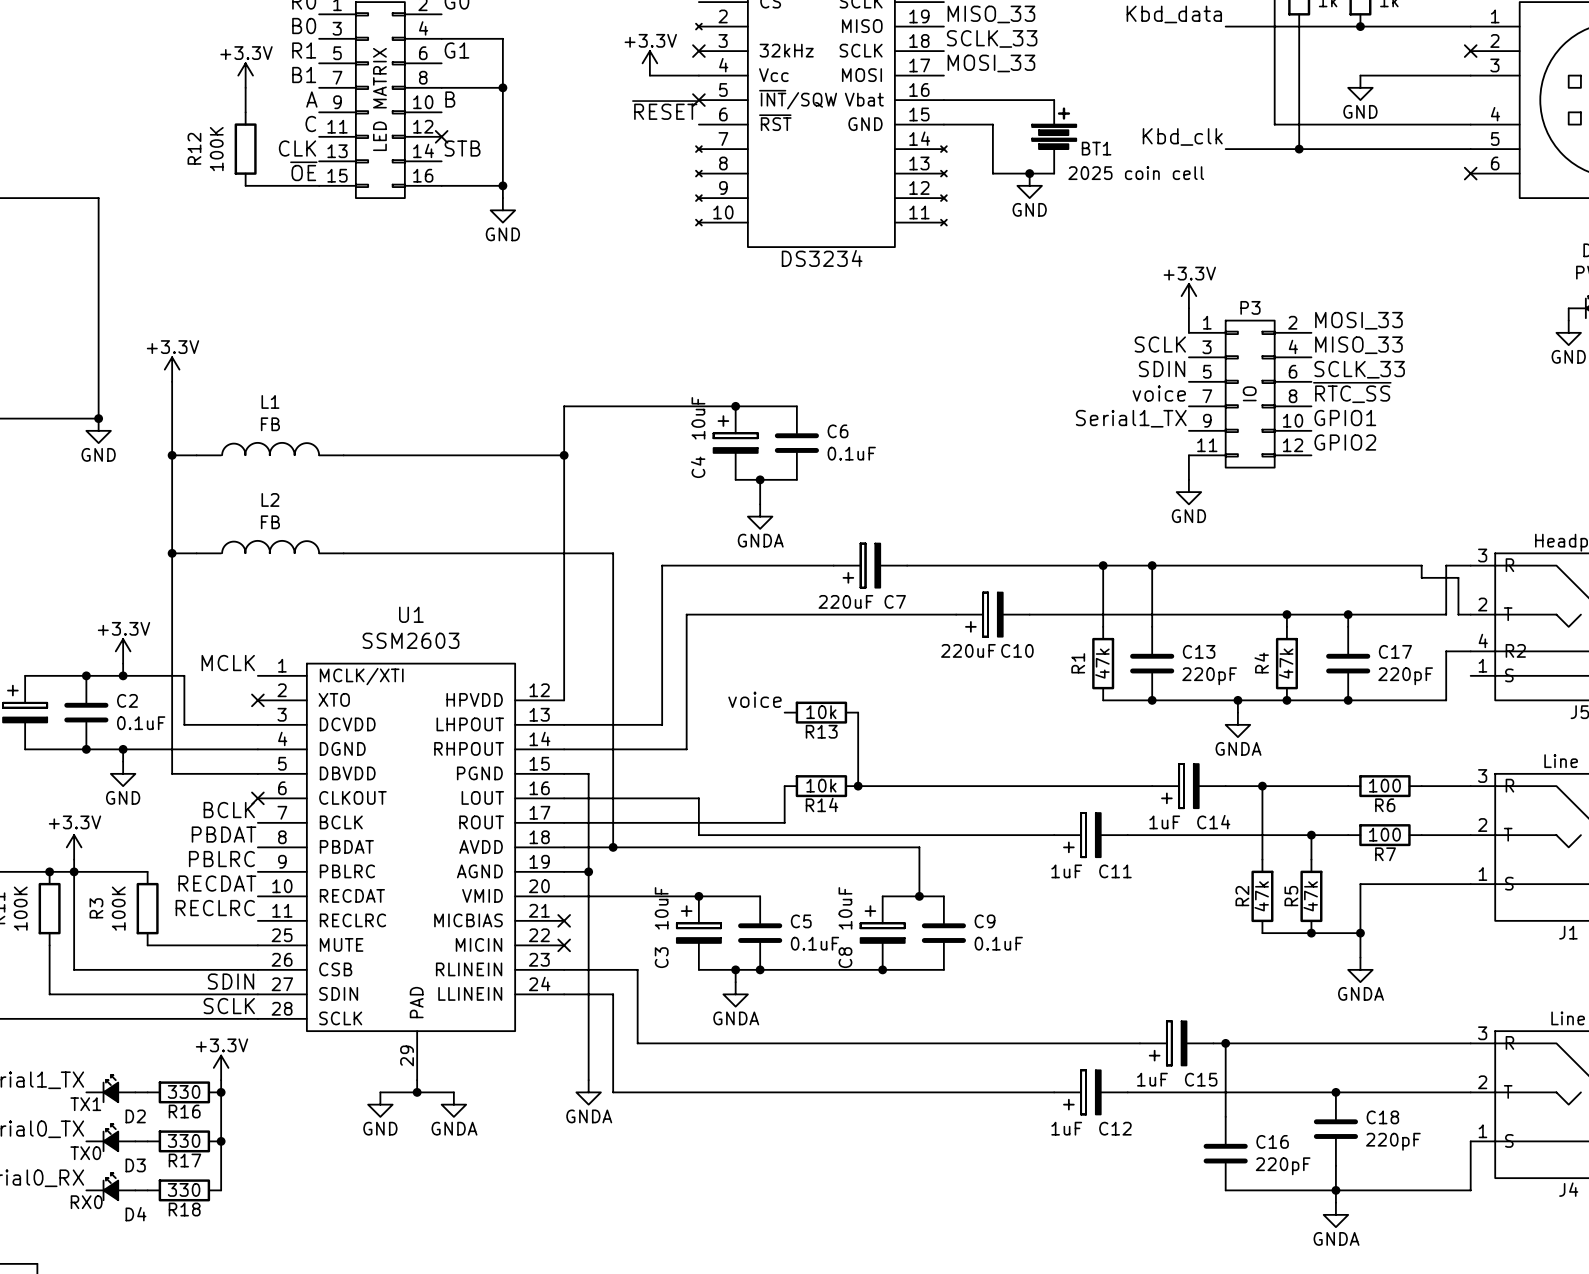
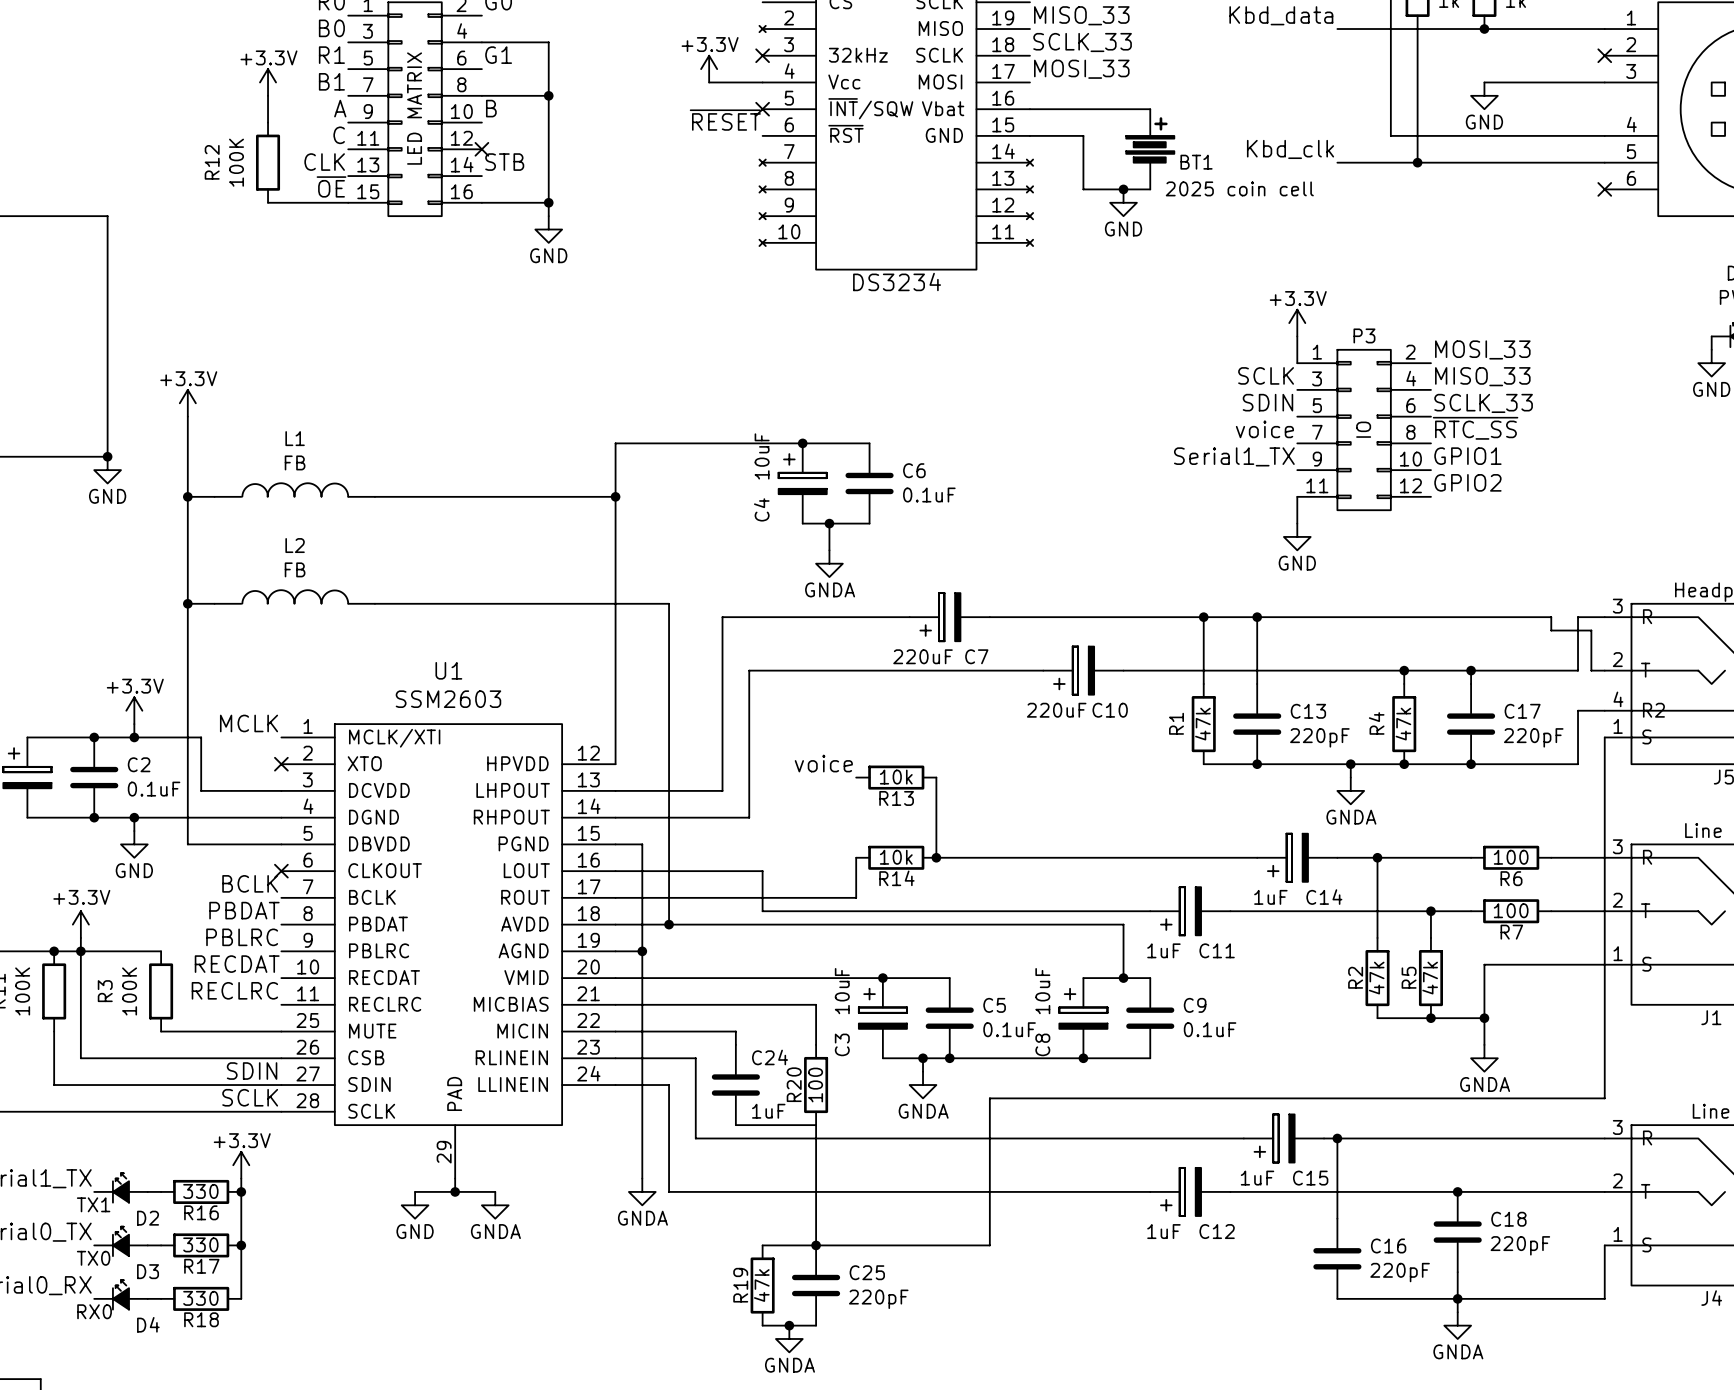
wire: none -> (1604, 737) (1604, 1098) (989, 1098) (989, 1245) (762, 1245)
wire: (919, 847) (919, 896) -> (1003, 924) (1123, 924) (1123, 978)
junction: (698, 896) -> none
junction: none -> (882, 978)
wire: (882, 896) (943, 896) -> (1083, 978) (1150, 978)
junction: (919, 896) -> none
junction: none -> (1123, 978)
wire: none -> (615, 1004) (816, 1004) (816, 1044)
no-connect mark: (564, 920) -> none
C3 position: (698, 933) -> (882, 1018)
C5 position: (760, 933) -> (949, 1018)
C8 position: (882, 933) -> (1083, 1018)
C9 position: (943, 933) -> (1150, 1018)
wire: none -> (615, 1031) (735, 1031) (735, 1044)
no-connect mark: (564, 945) -> none
wire: (698, 969) (809, 969) -> (829, 978) (949, 978)
wire: (735, 969) (735, 982) -> (923, 1058) (923, 1071)
junction: (735, 969) -> none
junction: (760, 969) -> none
junction: none -> (923, 1058)
junction position: (882, 969) -> (949, 1058)
wire: none -> (1029, 1058) (1150, 1058)
junction: none -> (1083, 1058)
C24: none -> 1uF (735, 1085)
power symbol position: GNDA (735, 994) -> GNDA (923, 1085)
R20: none -> 100 (816, 1085)
wire: none -> (735, 1125) (816, 1125) (816, 1245)
junction: none -> (816, 1245)
R19: none -> 47k (762, 1285)
C25: none -> 220pF (816, 1285)
wire: none -> (762, 1325) (816, 1325)
junction: none -> (789, 1325)
power symbol: none -> GNDA (789, 1338)

